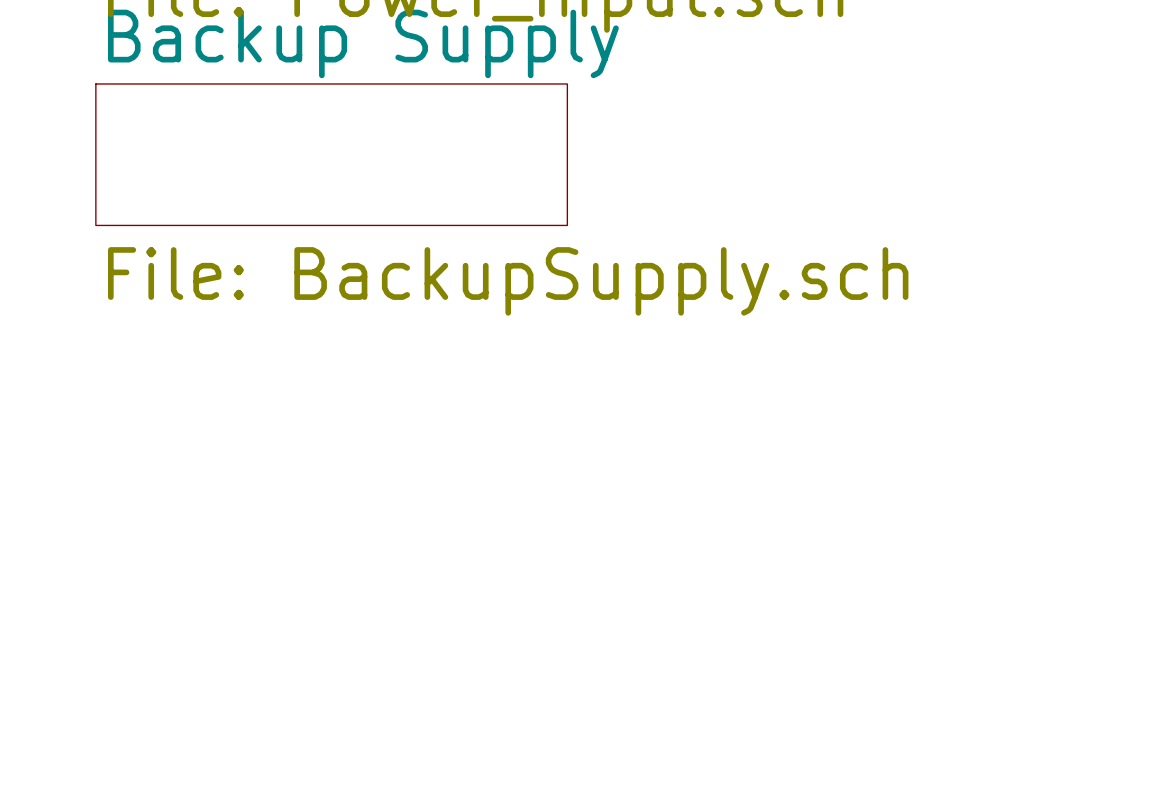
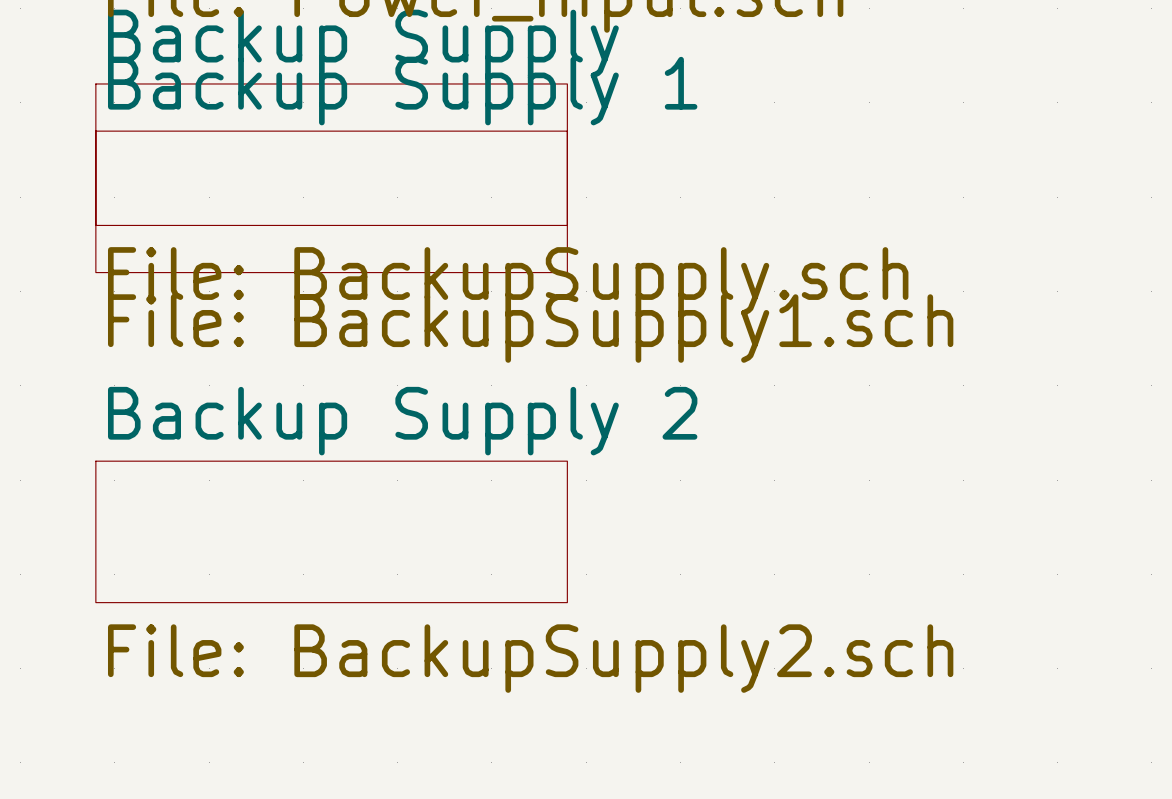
sheet Backup Supply 1: none -> File: BackupSupply1.sch (331, 201)
sheet Backup Supply 2: none -> File: BackupSupply2.sch (331, 531)

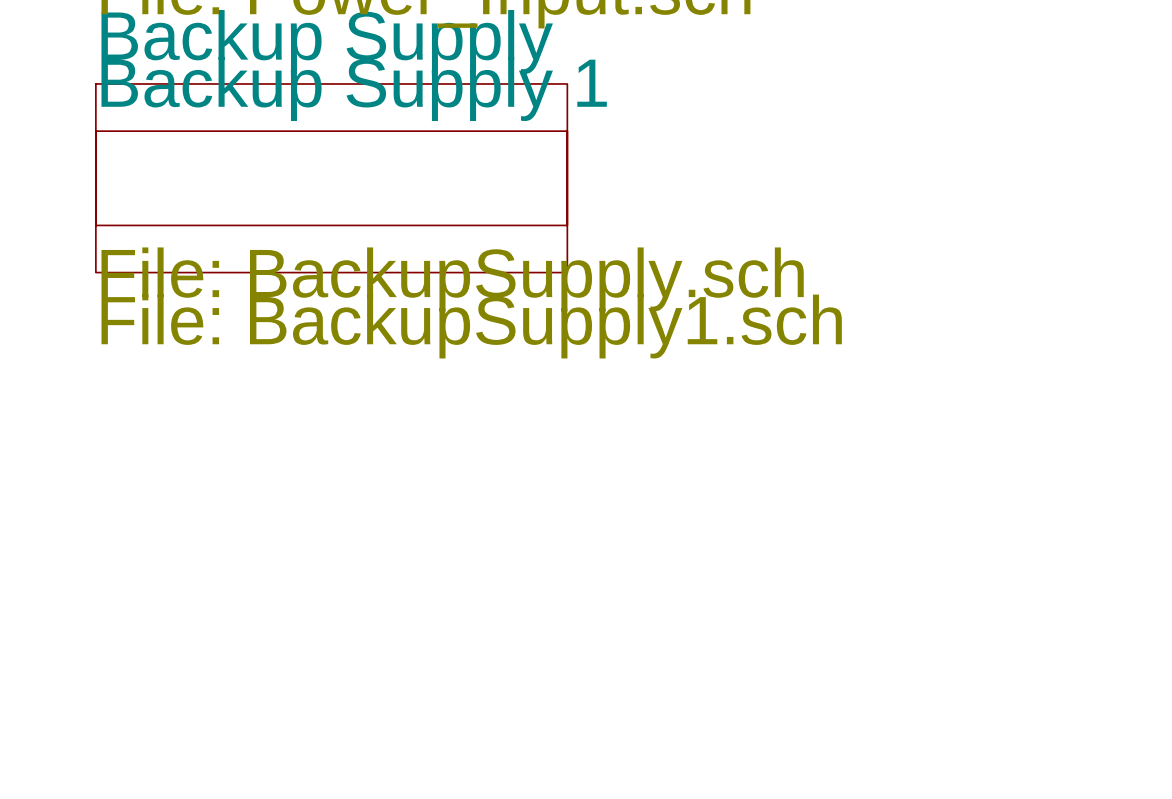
sheet Backup Supply 2: File: BackupSupply2.sch (331, 531) -> none

